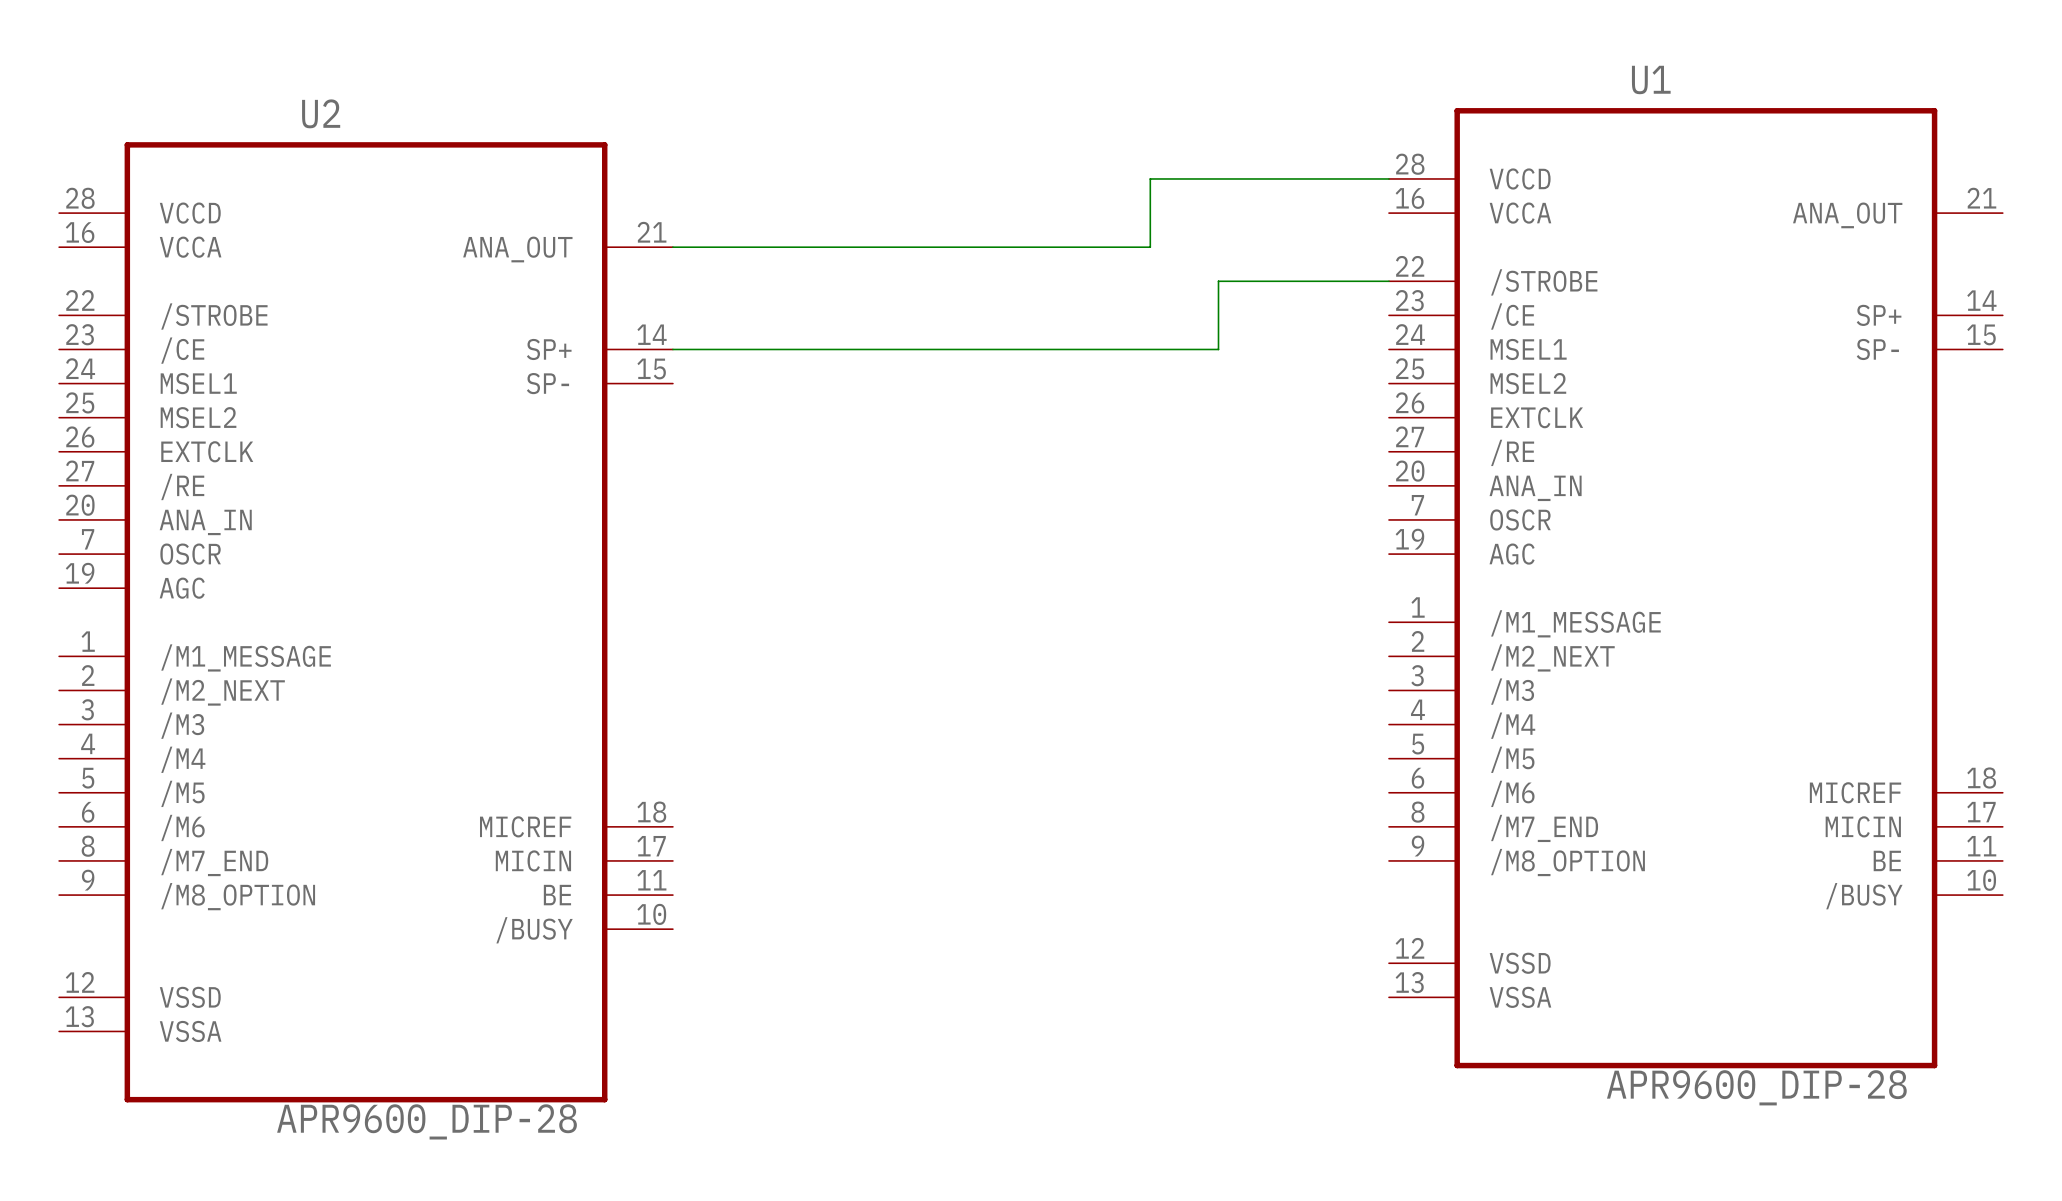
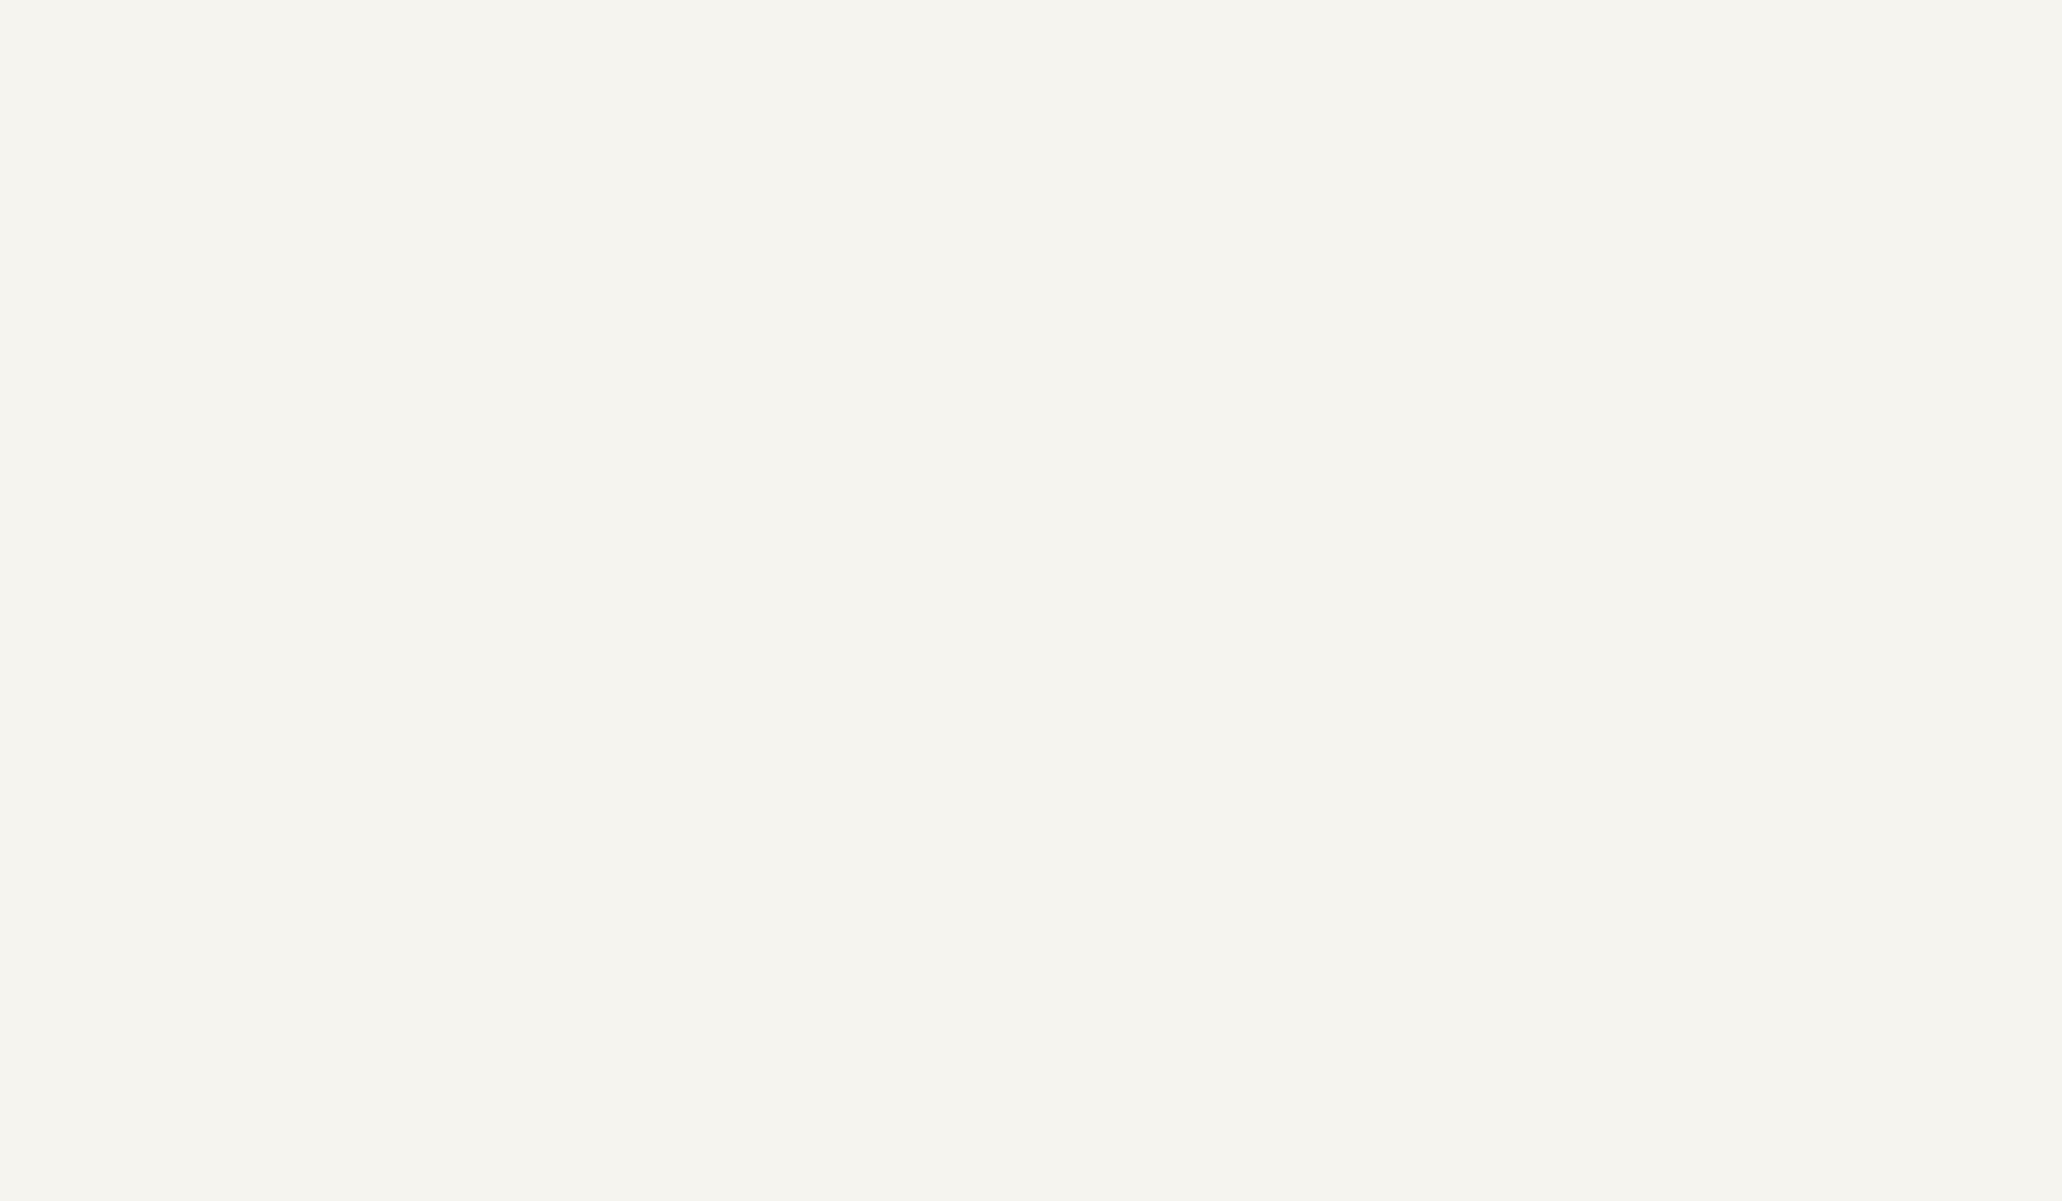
wire: (1388, 178) (1150, 178) (1150, 247) (672, 247) -> none
wire: (1388, 281) (1218, 281) (1218, 349) (672, 349) -> none
U1: APR9600_DIP-28 (1695, 588) -> none
U2: APR9600_DIP-28 (366, 622) -> none

